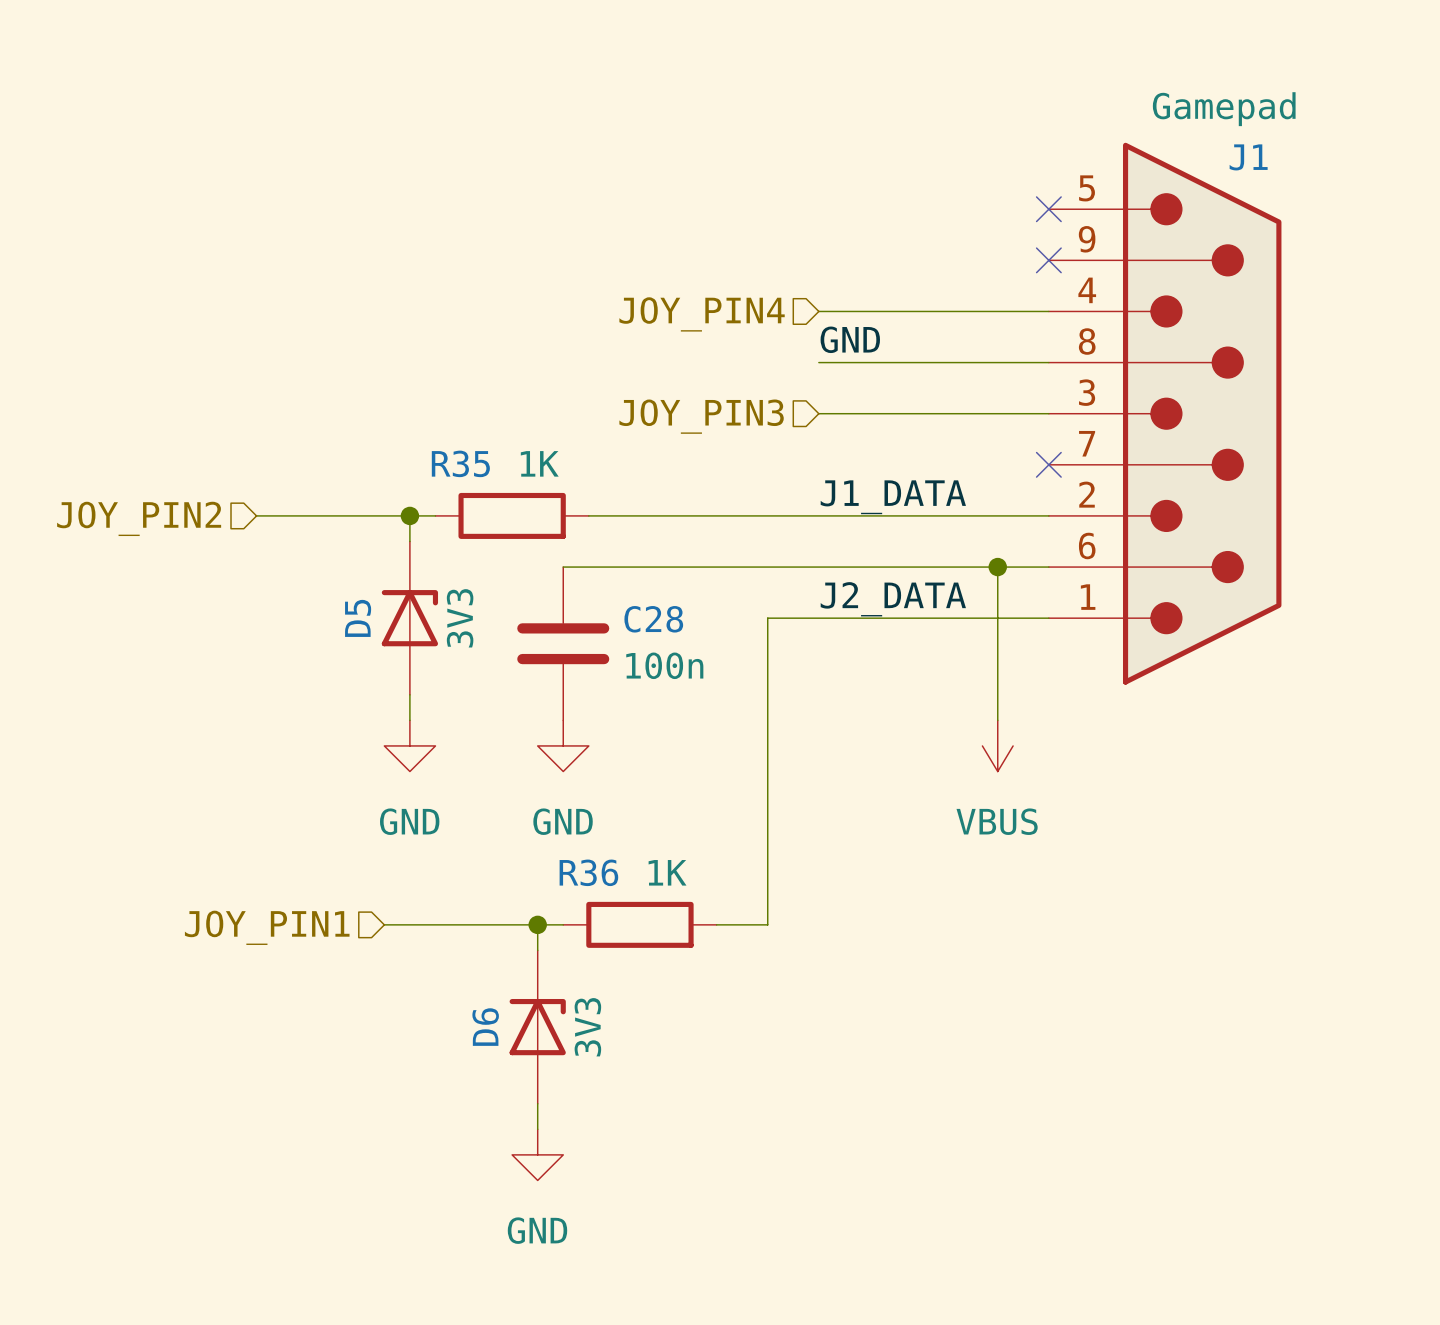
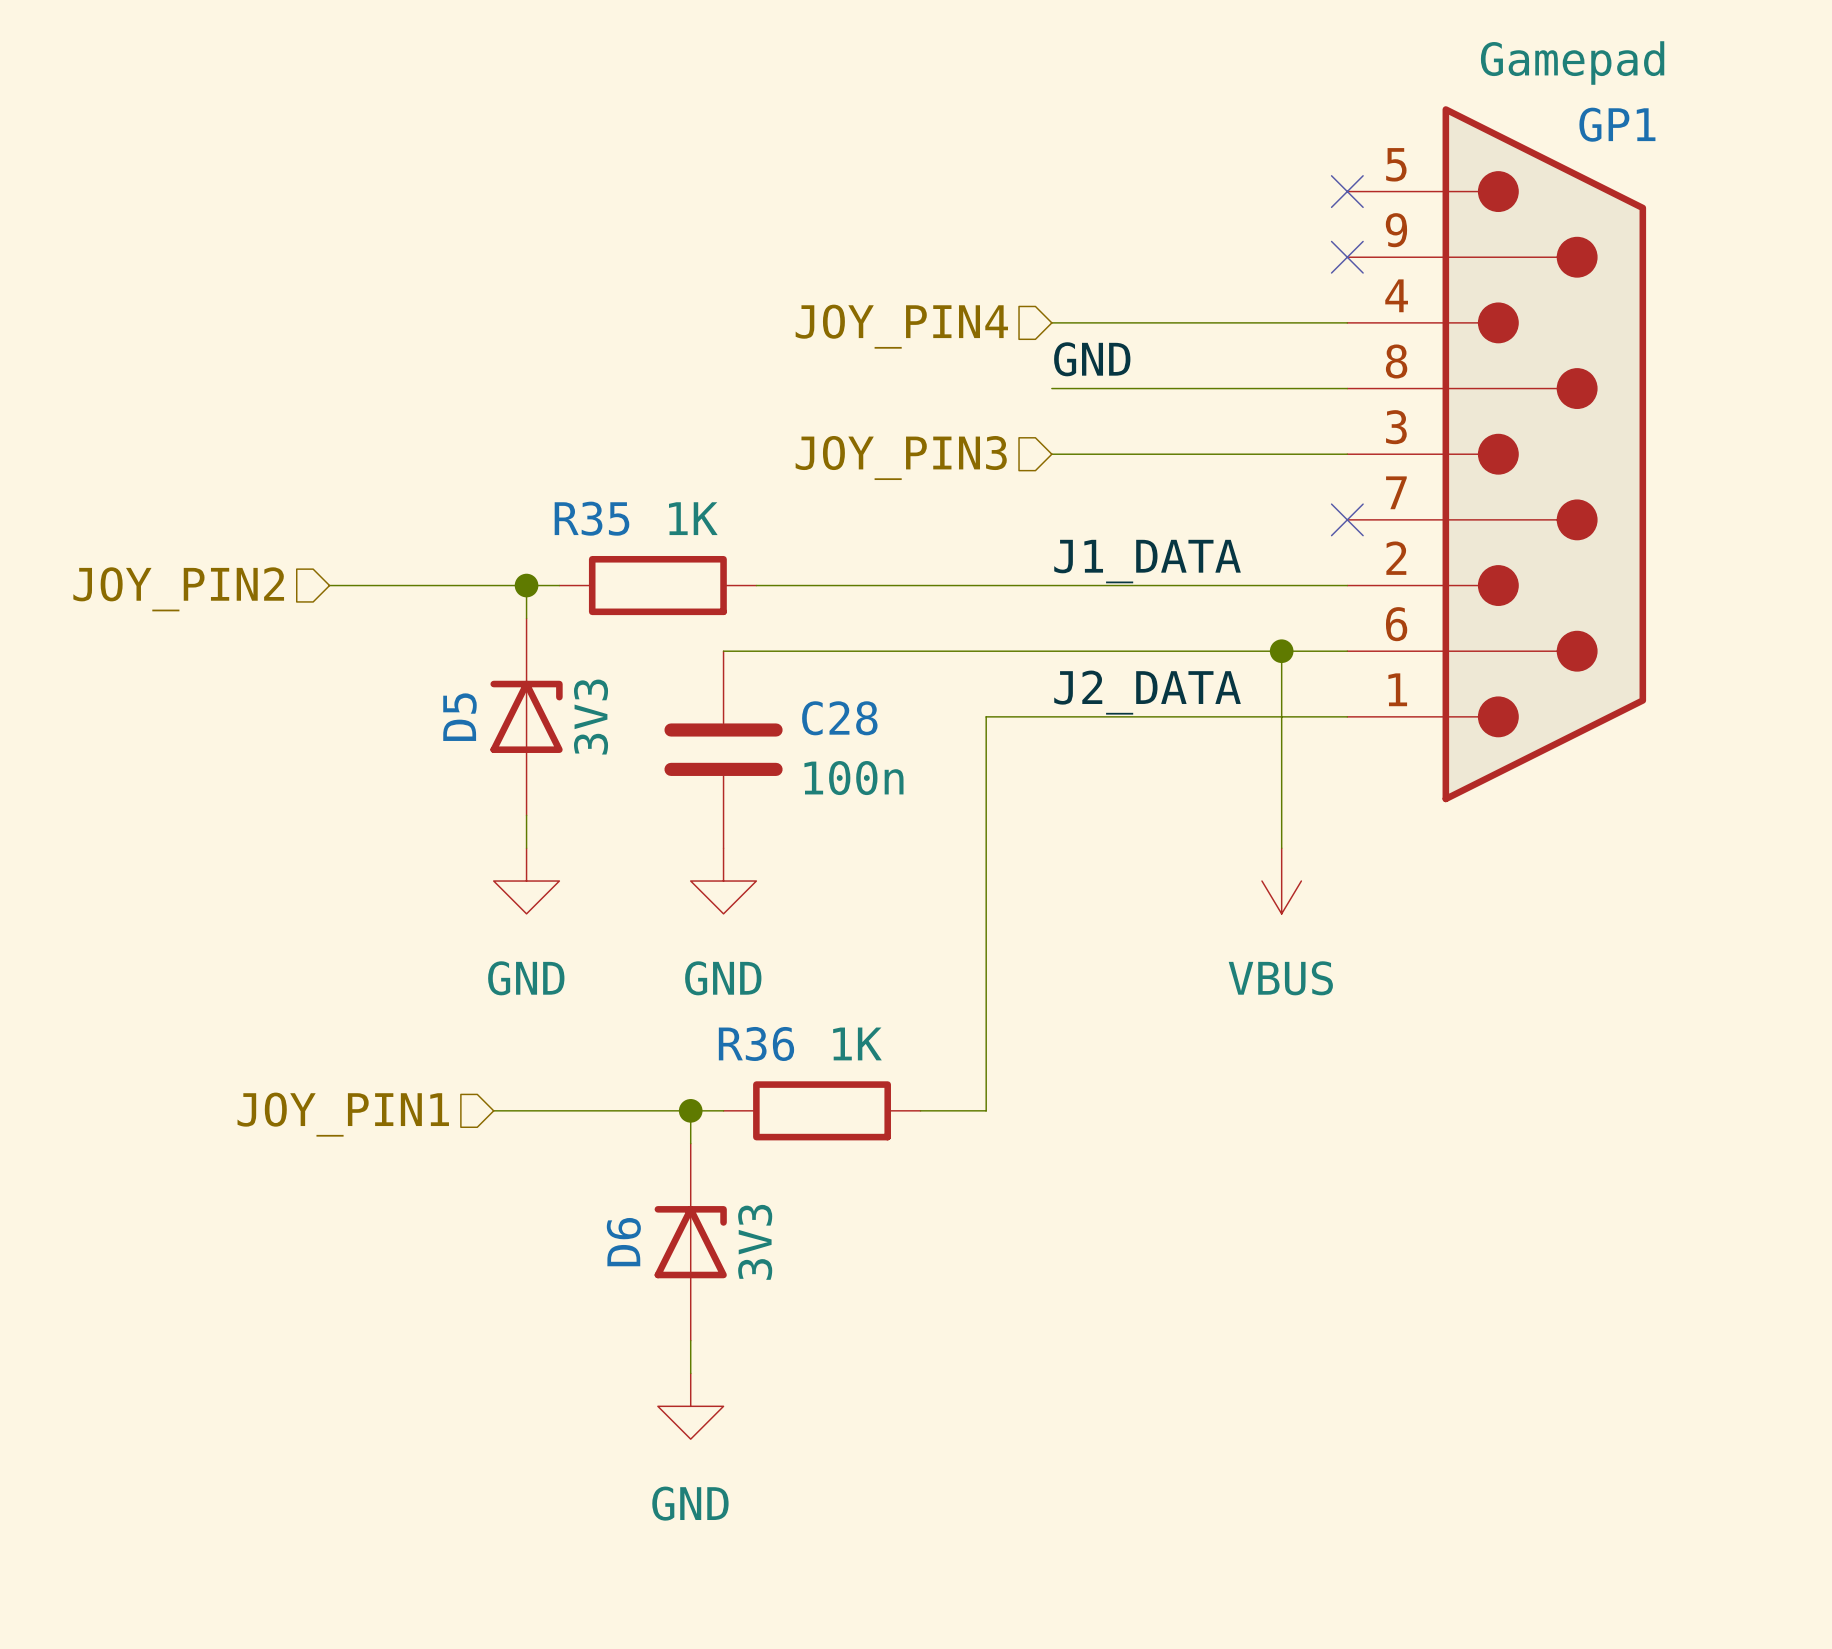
J1 name: J1 (1248, 157) -> GP1 (1617, 124)

